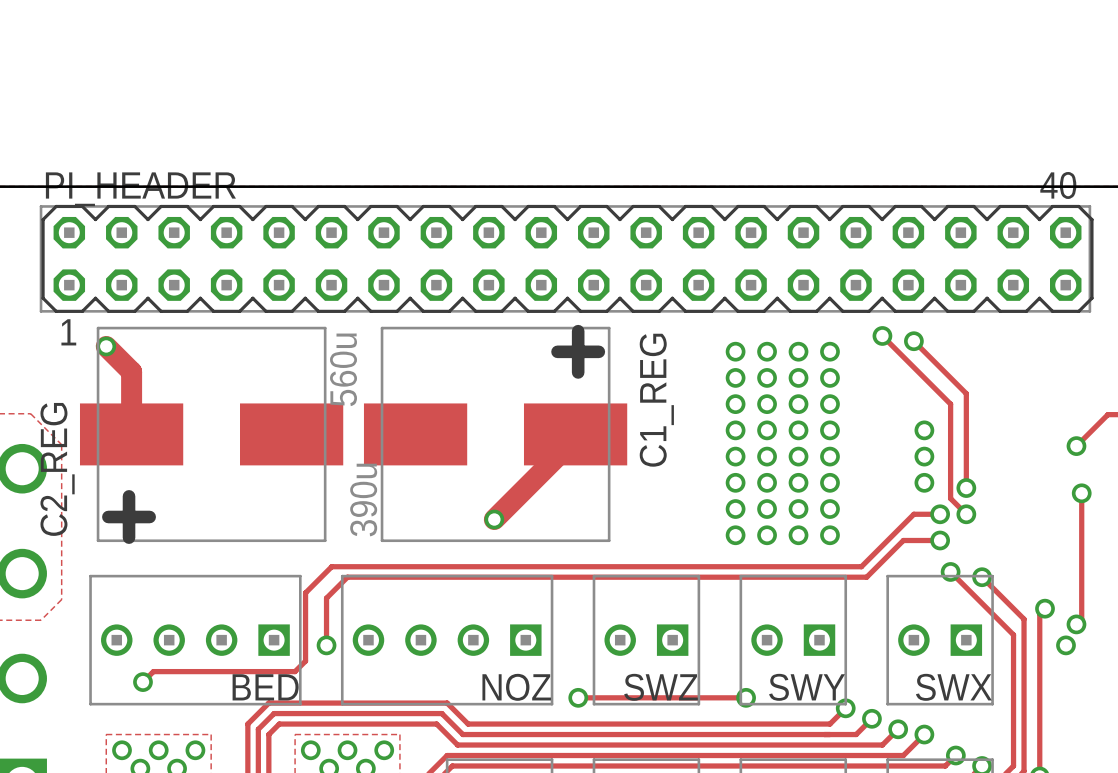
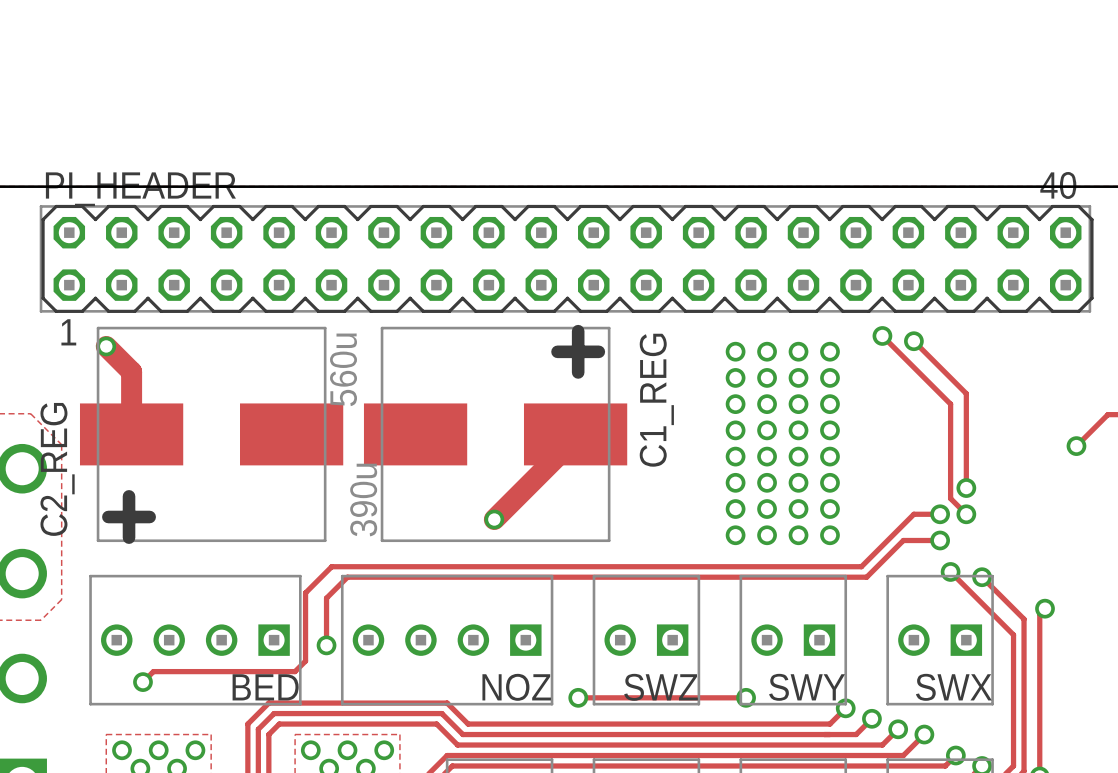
via: (924, 430) -> none
via: (924, 456) -> none
via: (924, 482) -> none
track: (1081, 493) (1081, 619) (1076, 624) -> none
via: (1081, 493) -> none
via: (1076, 624) -> none
via: (1065, 645) -> none

